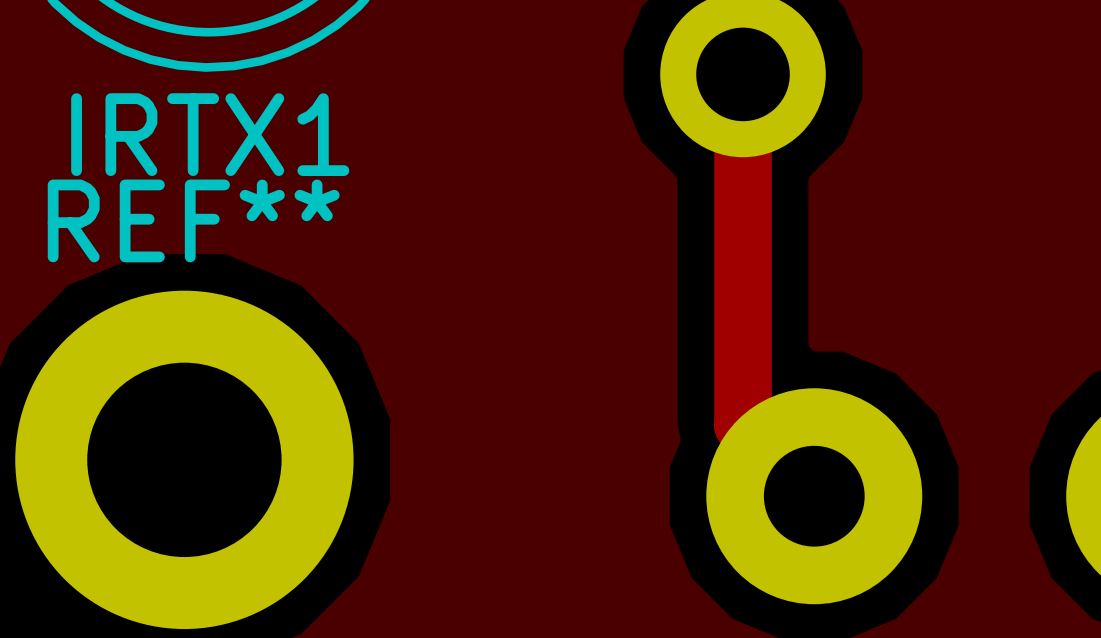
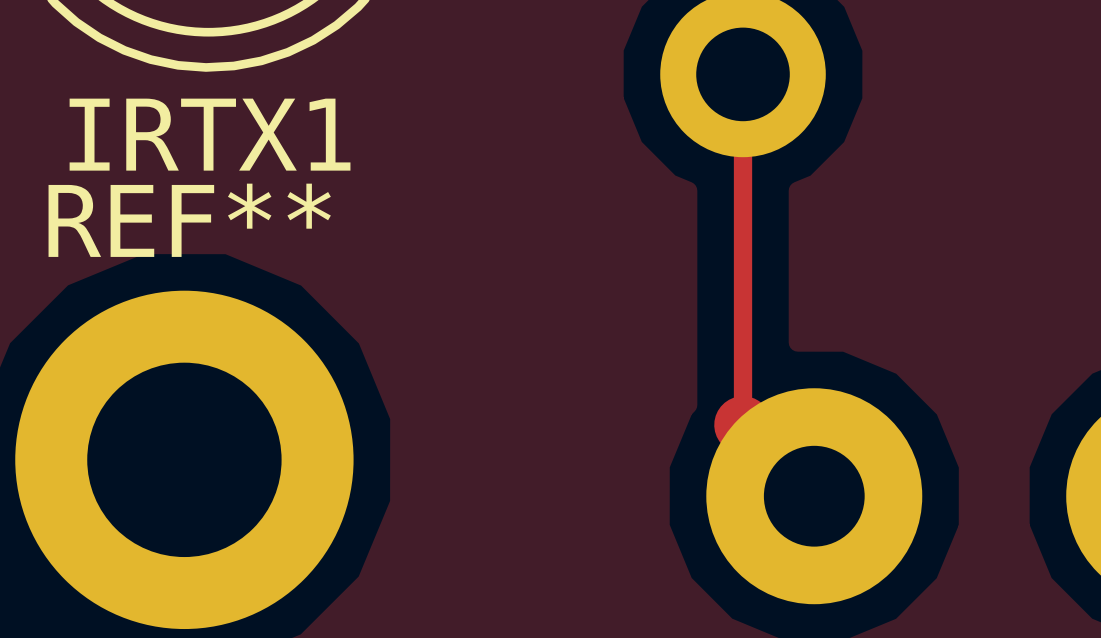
track width: thick (743, 74) (743, 424) -> thin (743, 74) (743, 424)

